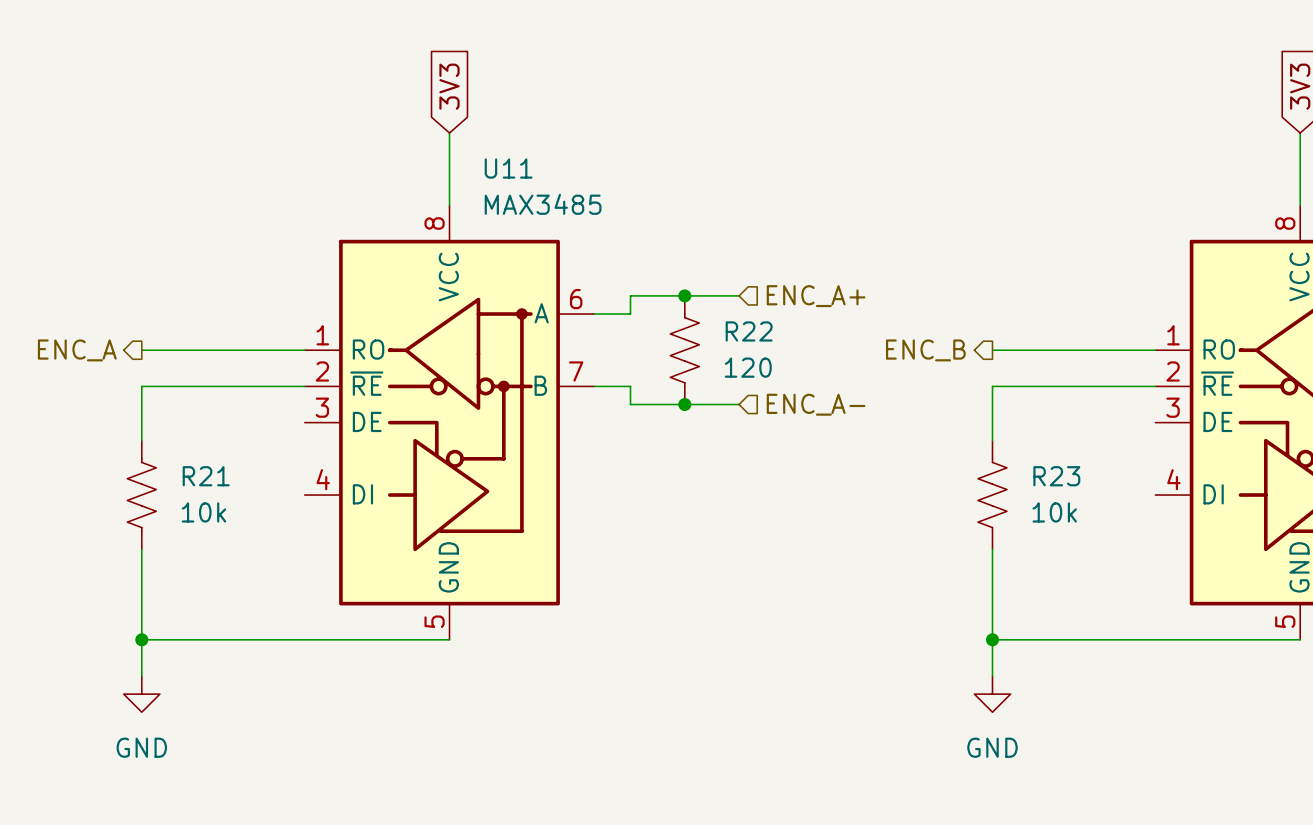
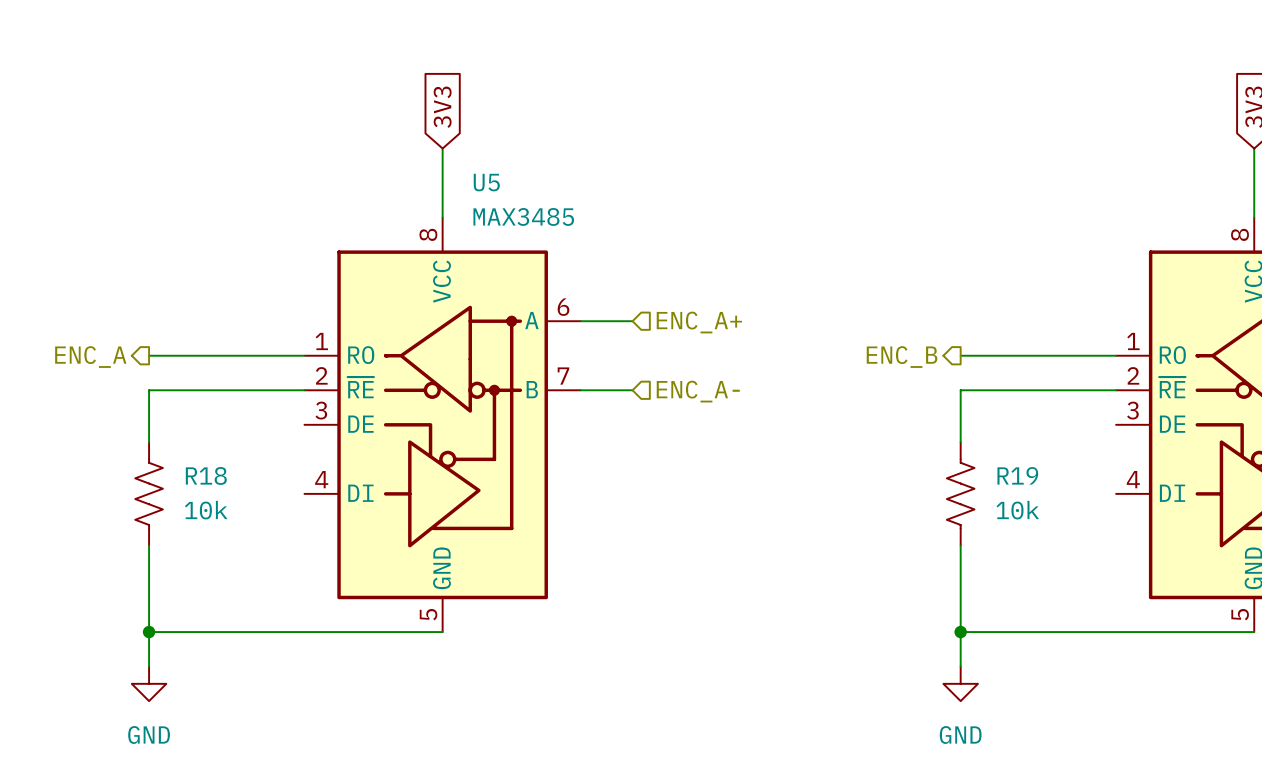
U11 name: U11 (508, 168) -> U5 (486, 182)
junction: (684, 295) -> none
wire: (739, 295) (630, 295) (630, 314) -> (632, 321) (615, 321)
hierarchical label position: ENC_A+ (816, 296) -> ENC_A+ (699, 322)
R22: 120 (684, 350) -> none
wire: (630, 386) (630, 404) (739, 404) -> (615, 390) (632, 390)
junction: (684, 404) -> none
hierarchical label position: ENC_A- (816, 404) -> ENC_A- (698, 391)
R21 name: R21 (206, 476) -> R18 (206, 475)
R23 name: R23 (1056, 476) -> R19 (1017, 475)

